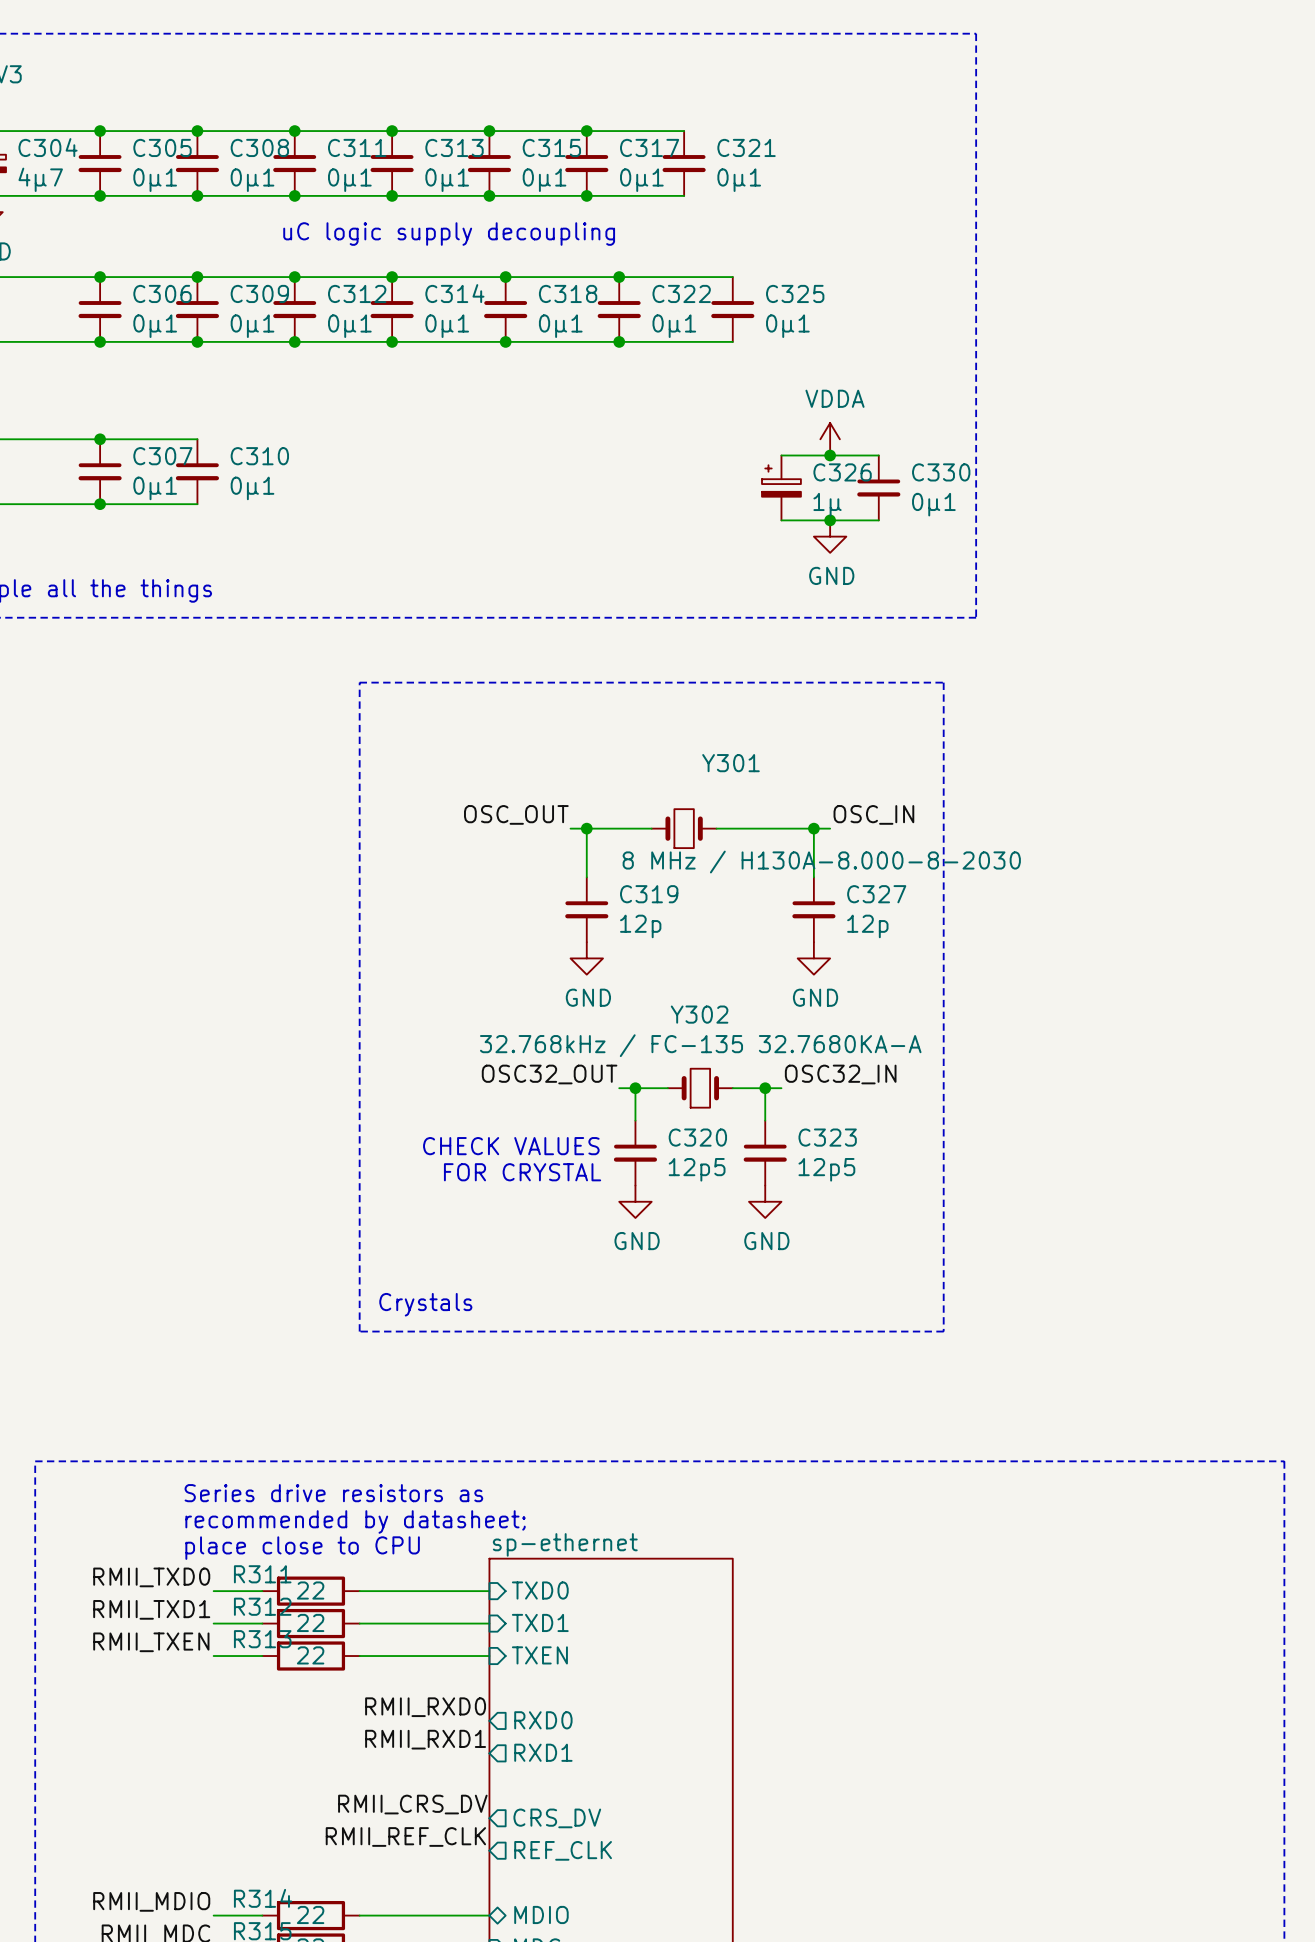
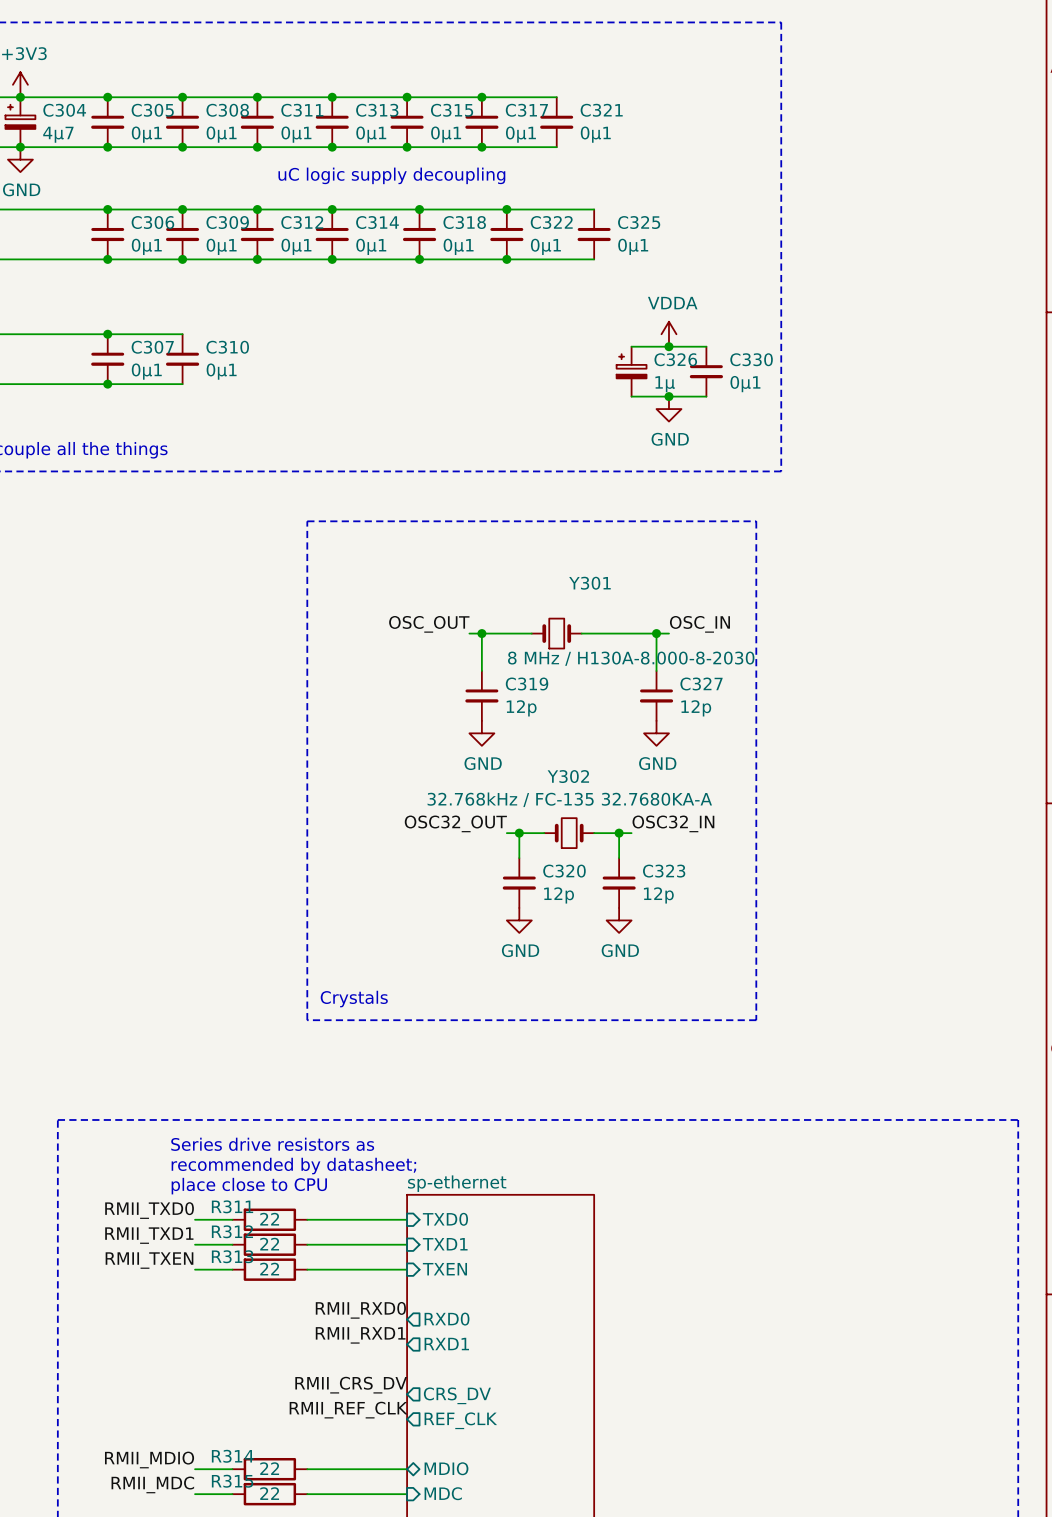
text: CHECK VALUES (511, 1146) -> none
C320 value: 12p5 (697, 1169) -> 12p (559, 895)
C323 value: 12p5 (826, 1169) -> 12p (658, 895)
text: FOR CRYSTAL (522, 1172) -> none

